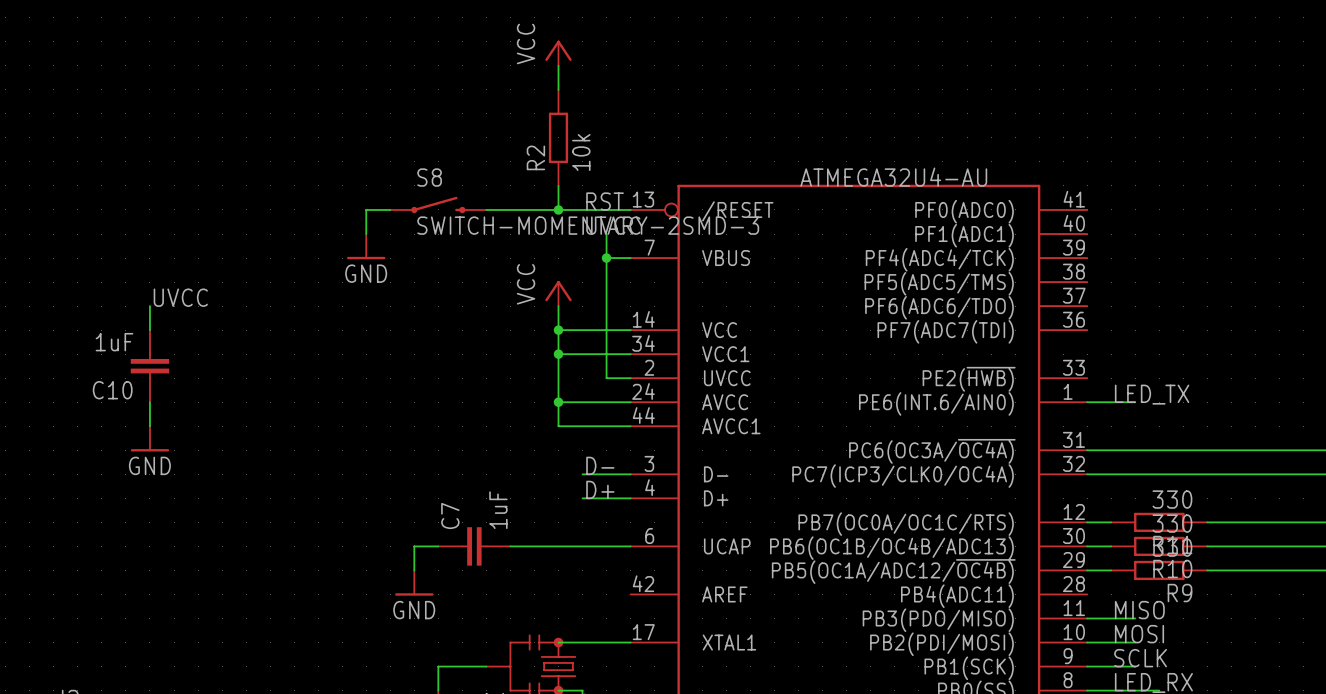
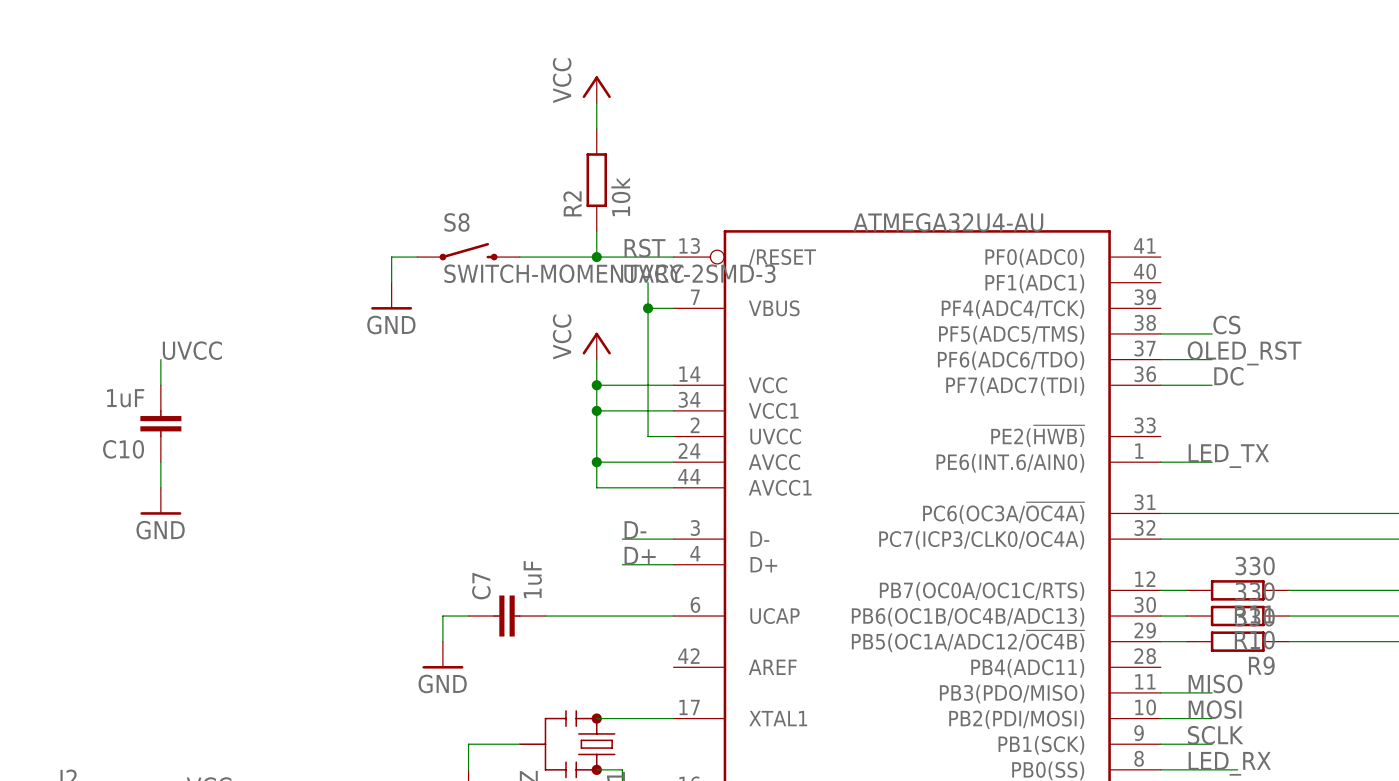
label: none -> CS (1226, 325)
wire: none -> (1160, 333) (1212, 333)
label: none -> OLED_RST (1244, 353)
wire: none -> (1160, 359) (1212, 359)
label: none -> DC (1228, 376)
wire: none -> (1160, 385) (1212, 385)

